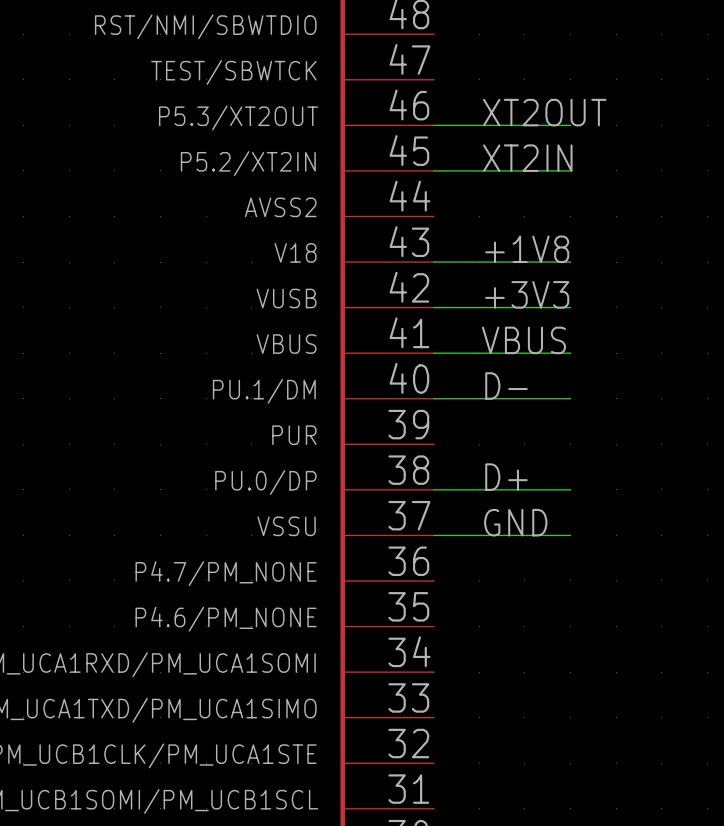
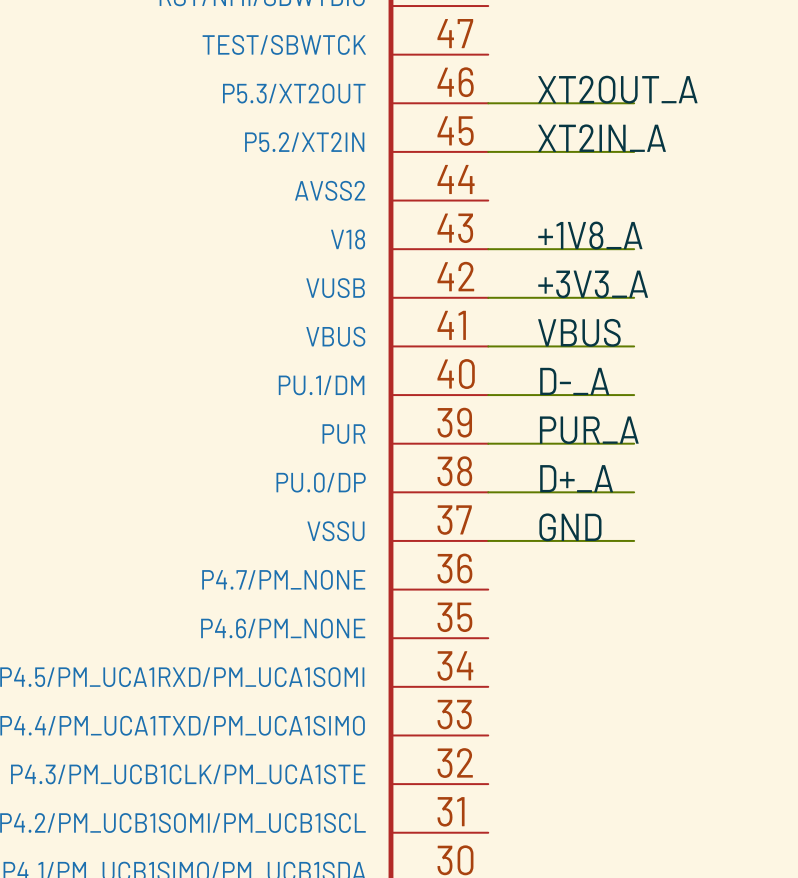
label: XT2OUT (544, 112) -> XT2OUT_A (617, 89)
label: XT2IN (527, 158) -> XT2IN_A (602, 138)
label: +1V8 (527, 249) -> +1V8_A (590, 235)
label: +3V3 (527, 294) -> +3V3_A (593, 284)
label: D- (506, 385) -> D-_A (574, 381)
label: none -> PUR_A (589, 430)
wire: none -> (488, 443) (634, 443)
label: D+ (506, 477) -> D+_A (576, 478)

